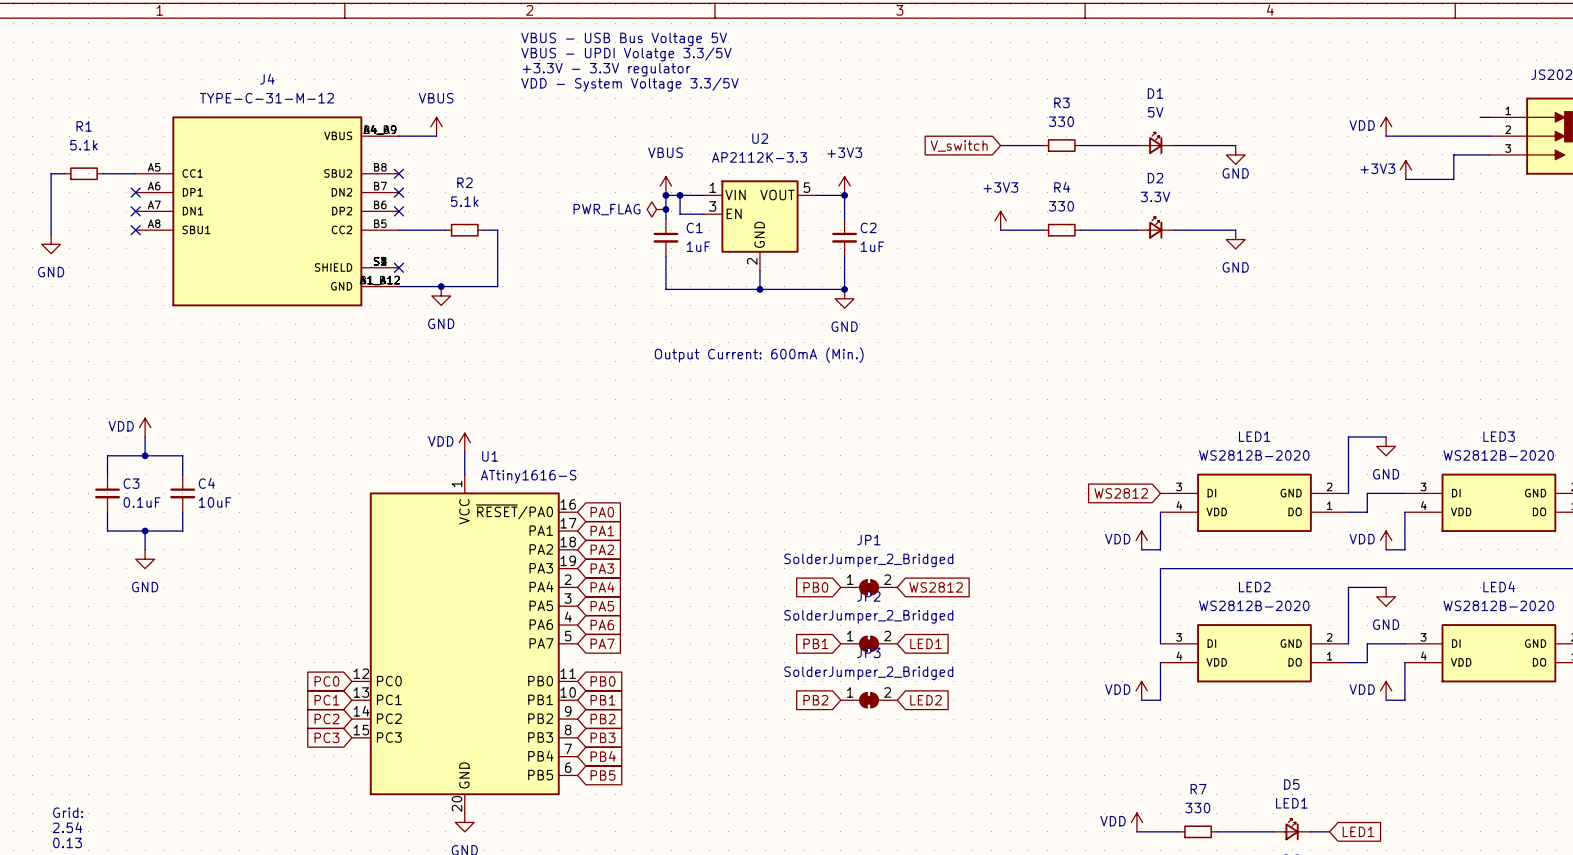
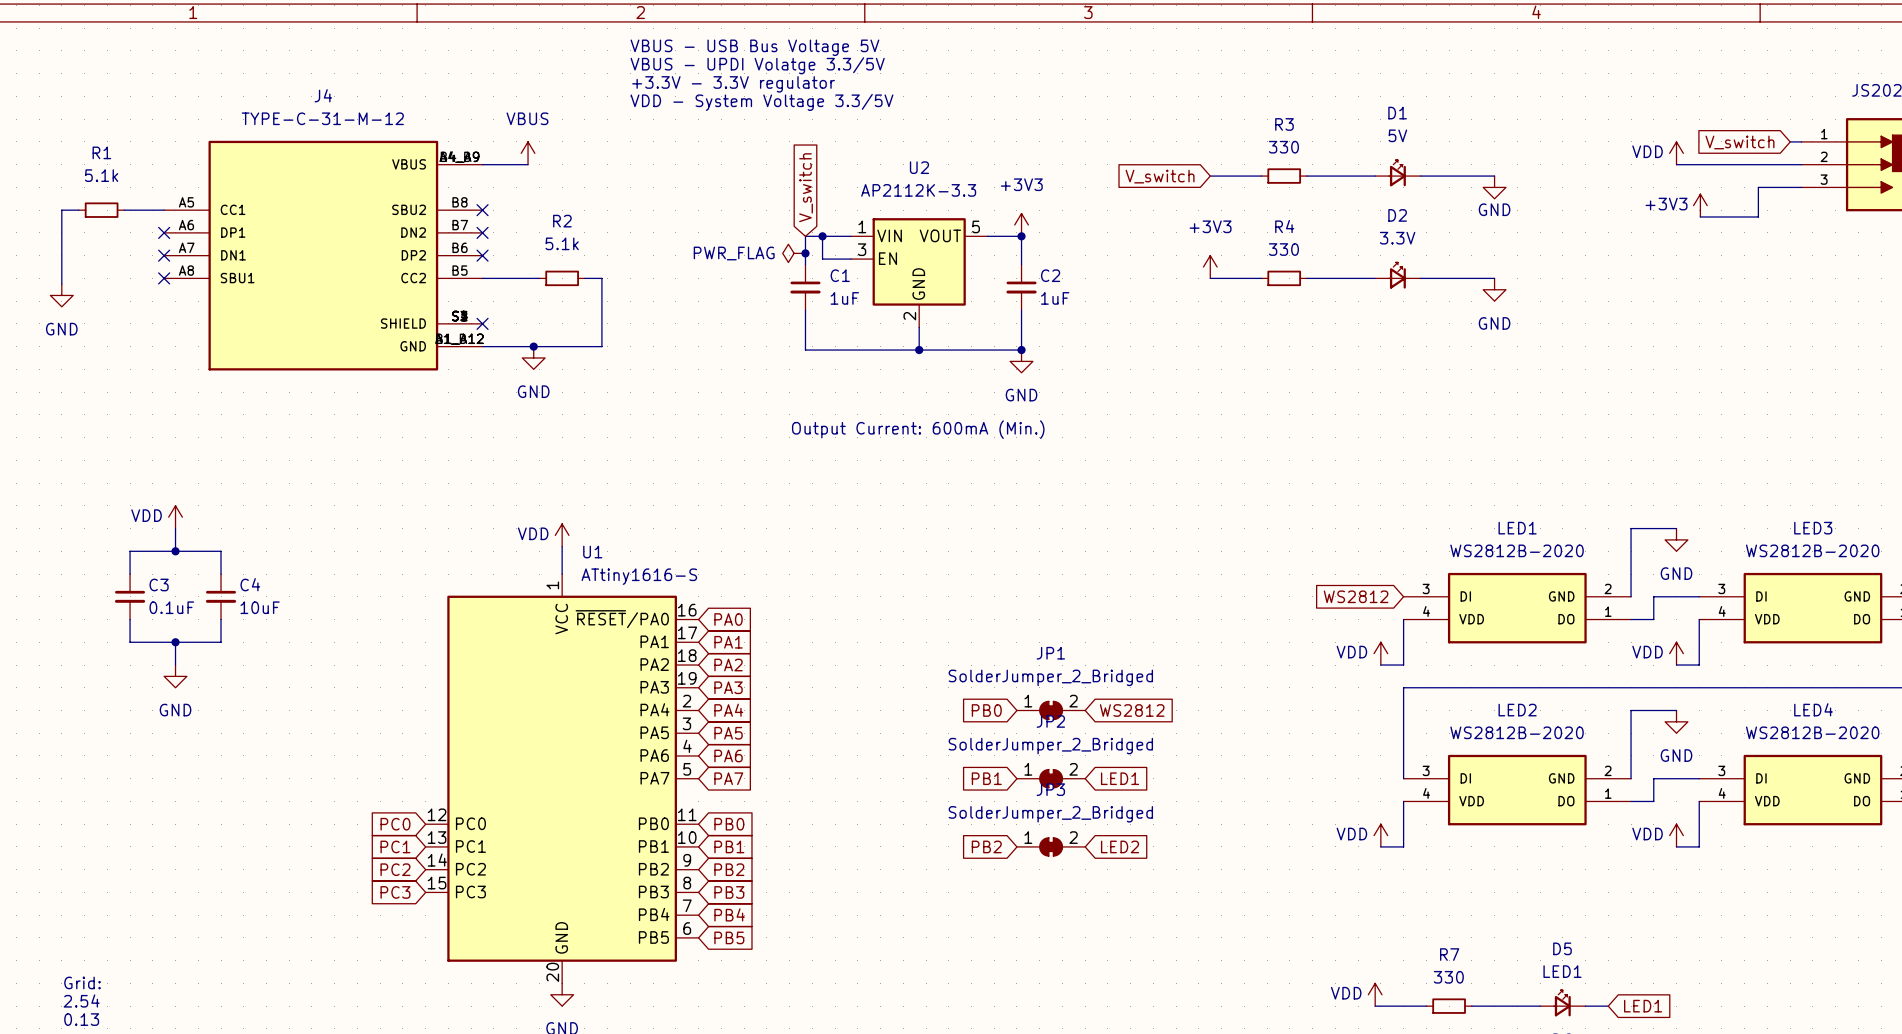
global label: none -> V_switch (1739, 142)
global label: none -> V_switch (806, 187)
power symbol: VBUS (665, 185) -> none
junction: (665, 195) -> none

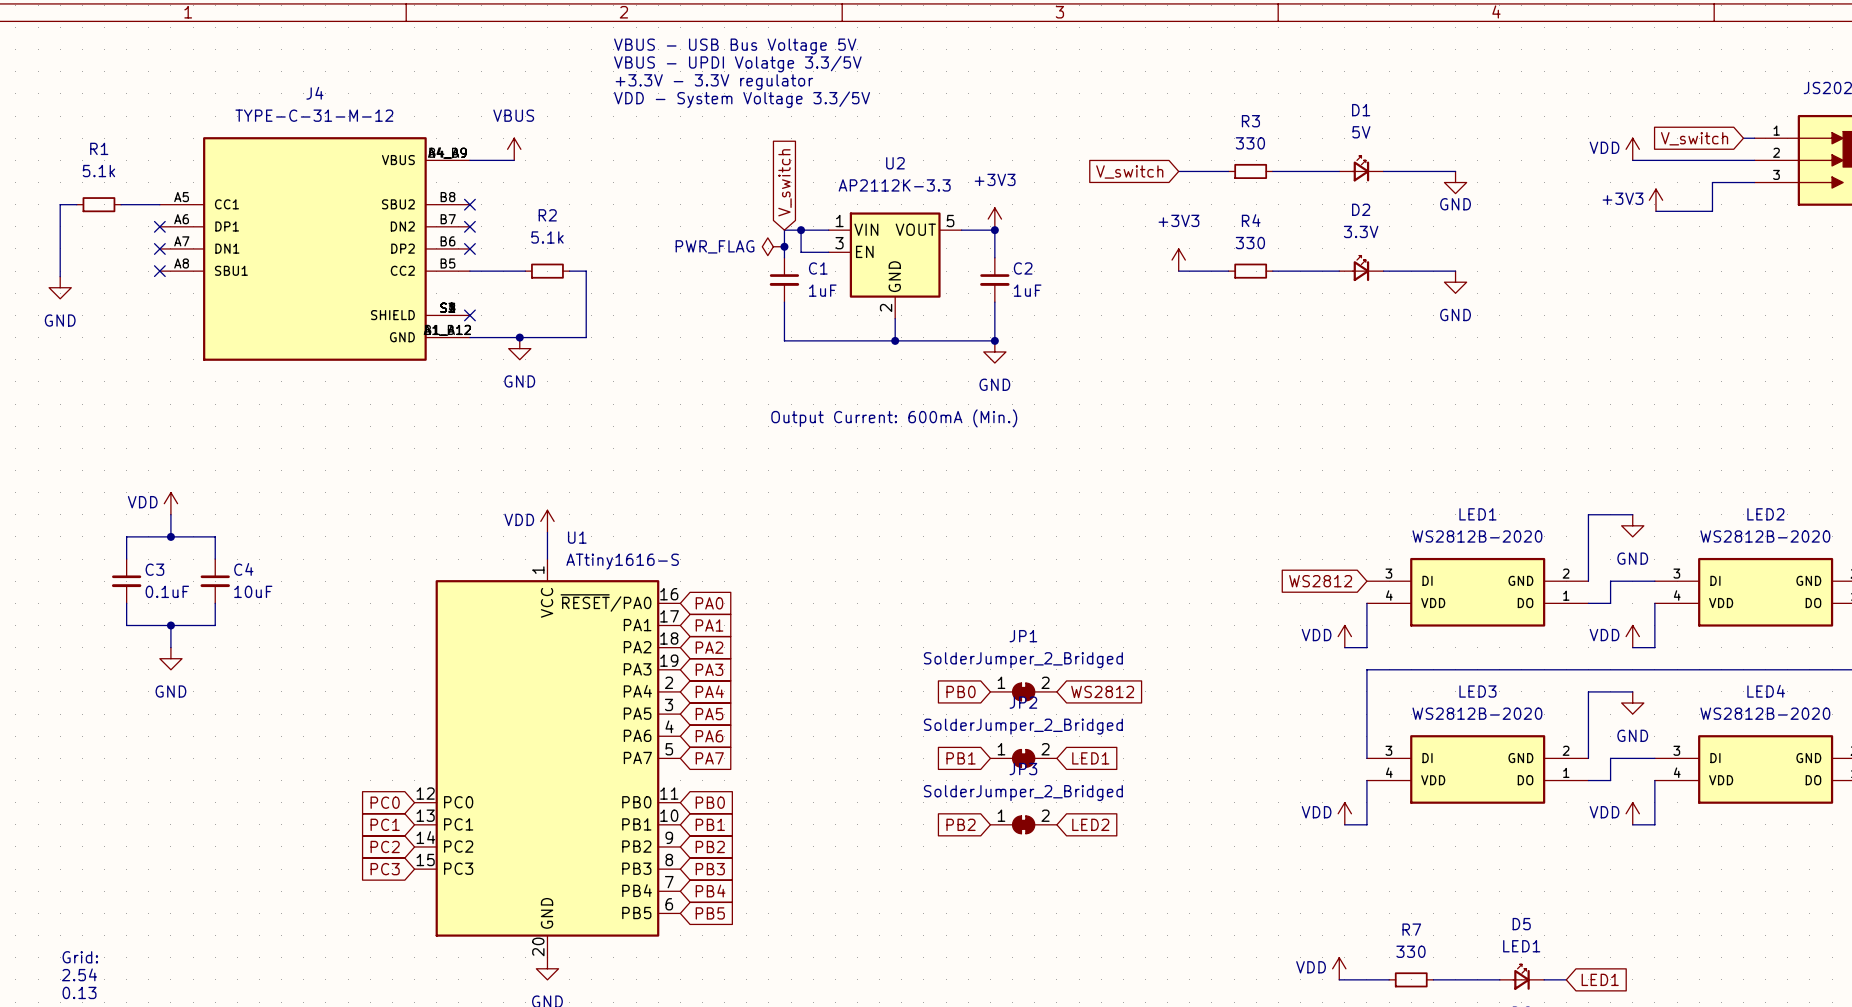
LED3 name: LED3 (1813, 528) -> LED2 (1765, 514)
LED2 name: LED2 (1517, 710) -> LED3 (1477, 691)

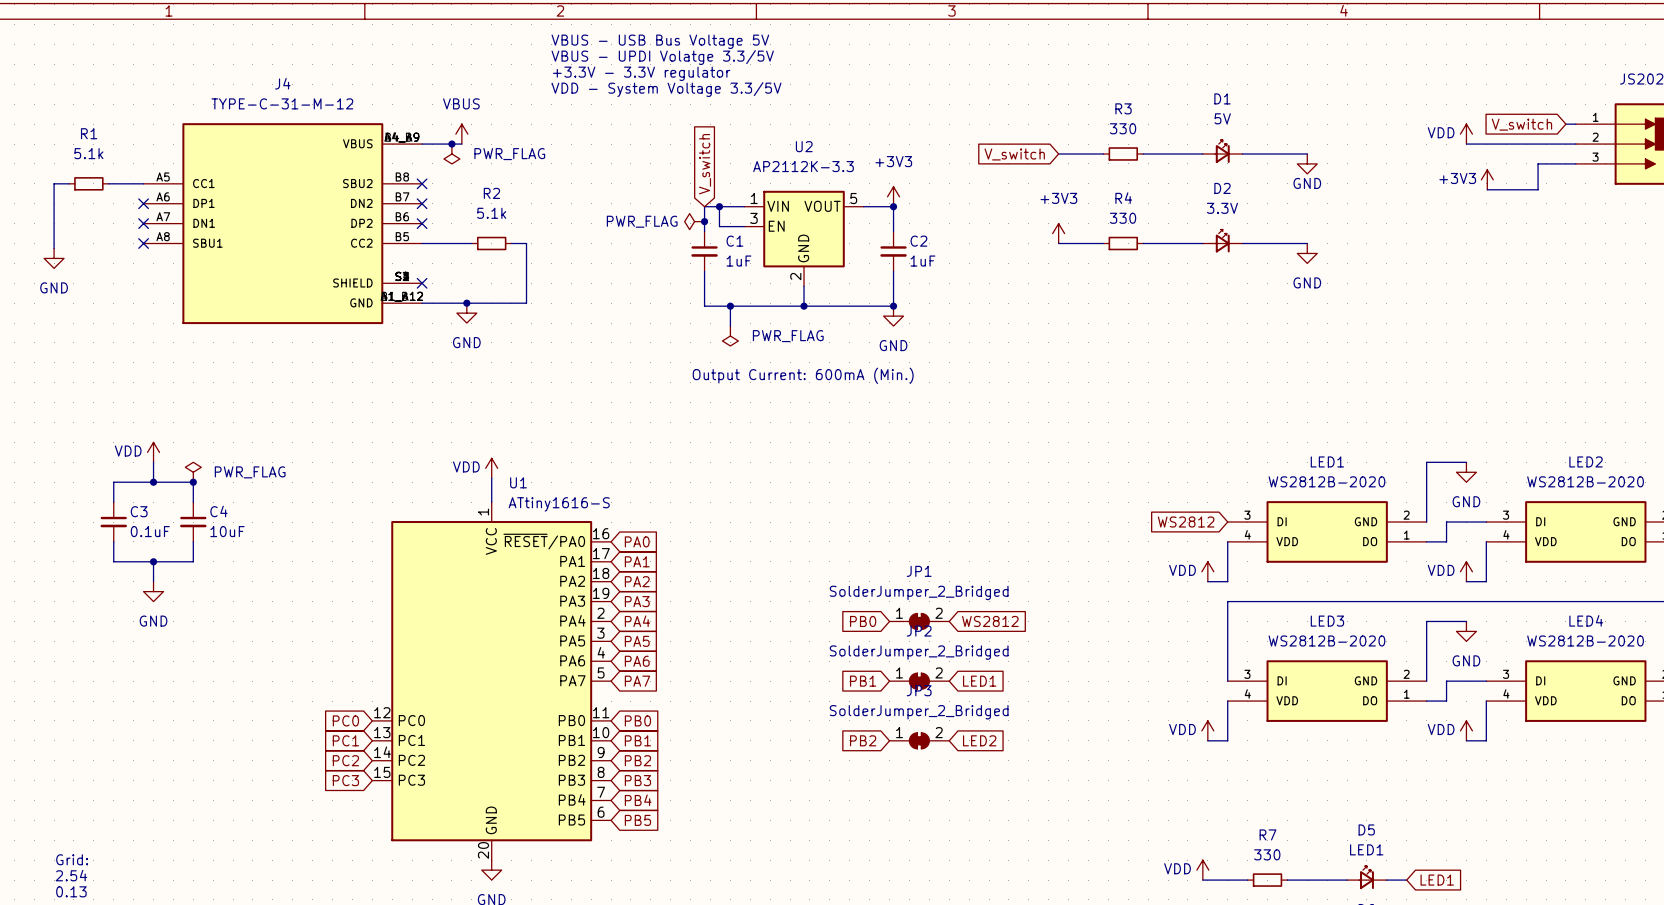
junction: none -> (451, 144)
power symbol: none -> PWR_FLAG (451, 153)
wire: none -> (730, 306) (730, 326)
junction: none -> (730, 306)
power symbol: none -> PWR_FLAG (730, 336)
power symbol: none -> PWR_FLAG (193, 472)
junction: none -> (193, 482)

